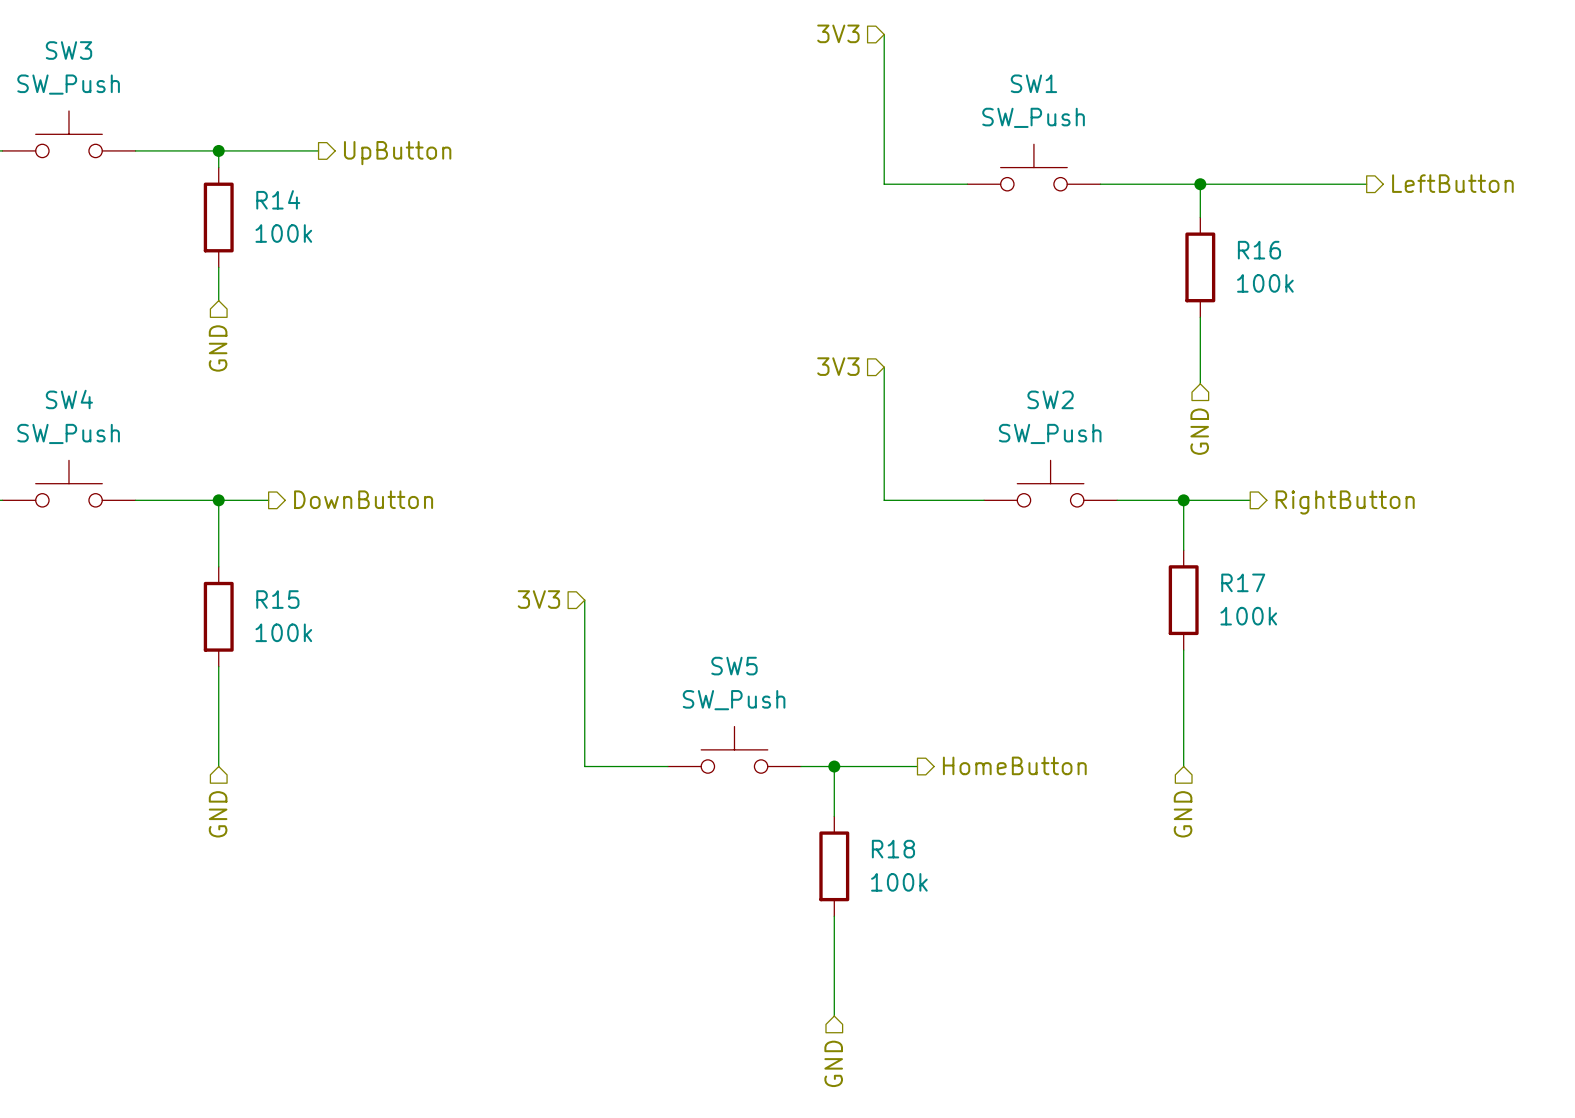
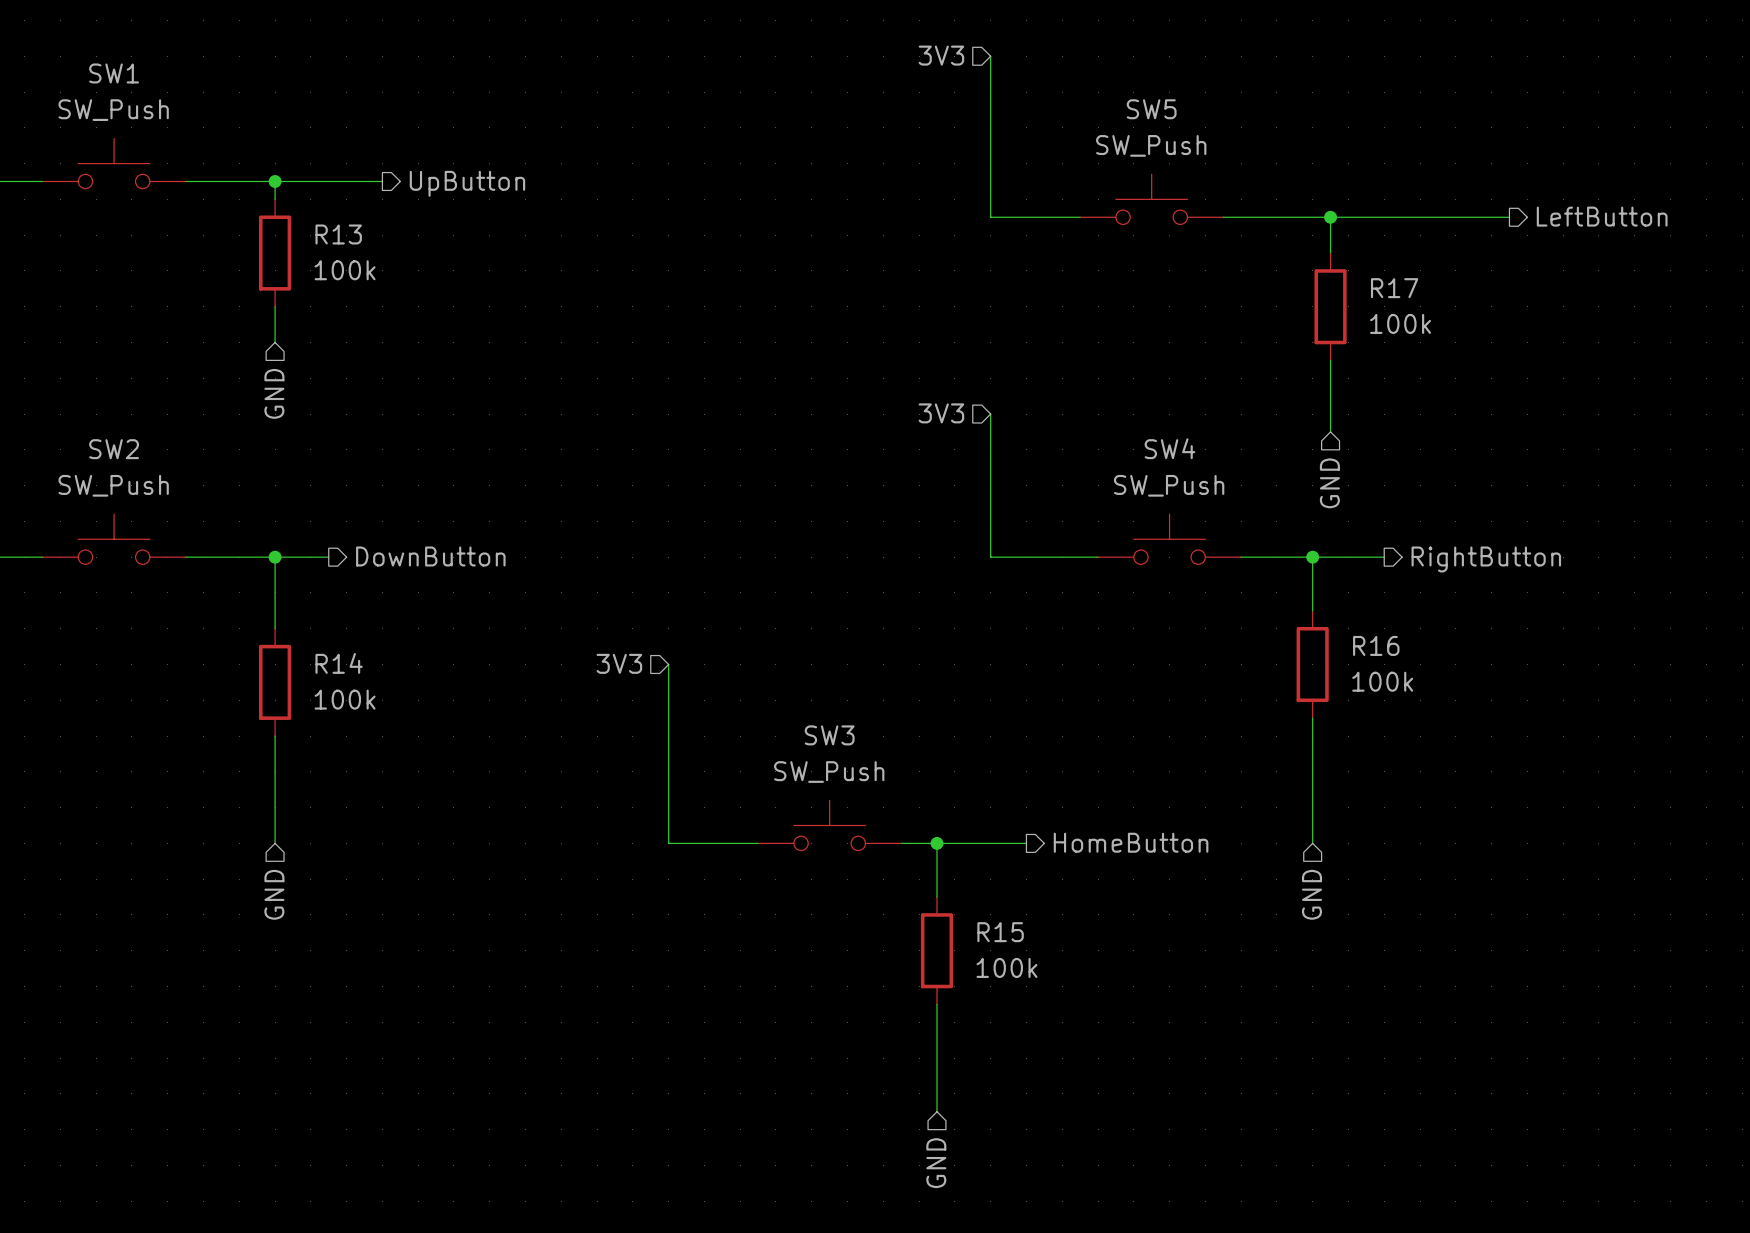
SW3 name: SW3 (68, 50) -> SW1 (114, 73)
SW1 name: SW1 (1033, 83) -> SW5 (1151, 109)
R14 name: R14 (278, 199) -> R13 (338, 234)
R16 name: R16 (1259, 250) -> R17 (1394, 288)
SW4 name: SW4 (69, 399) -> SW2 (114, 449)
SW2 name: SW2 (1050, 399) -> SW4 (1169, 448)
R17 name: R17 (1243, 582) -> R16 (1376, 645)
R15 name: R15 (277, 599) -> R14 (339, 663)
SW5 name: SW5 (734, 666) -> SW3 (829, 735)
R18 name: R18 (893, 849) -> R15 (1000, 932)

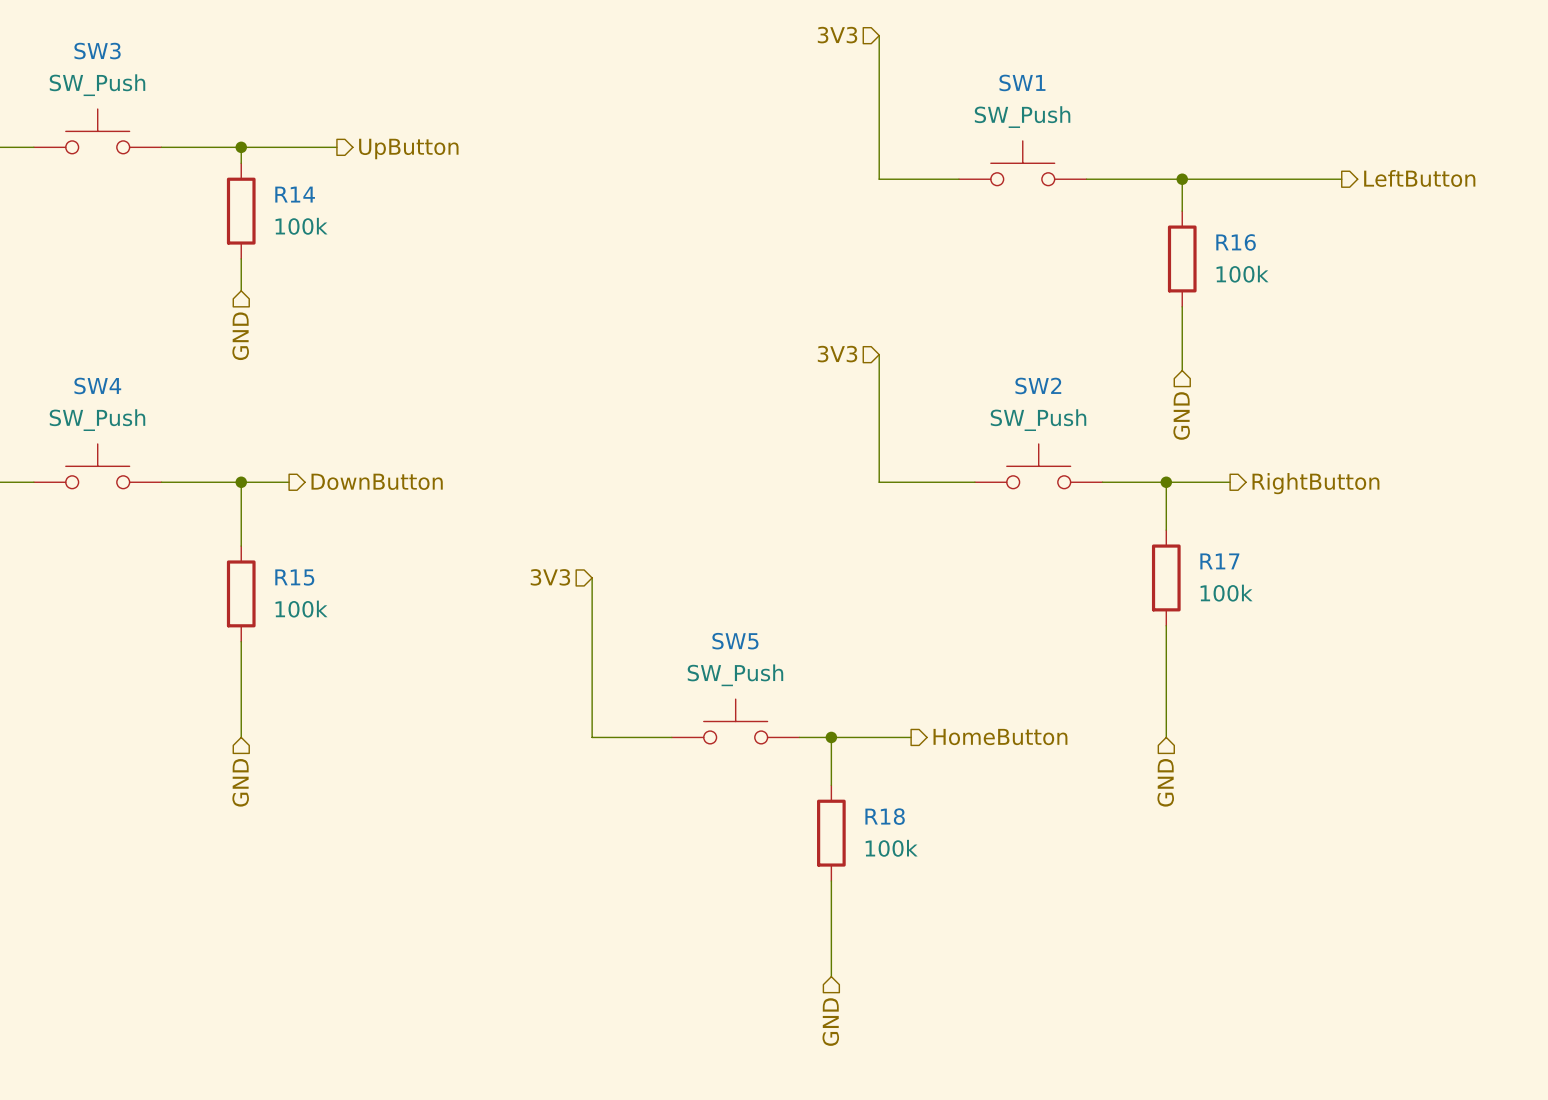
SW1 name: SW1 (114, 73) -> SW3 (97, 51)
SW5 name: SW5 (1151, 109) -> SW1 (1022, 82)
R13 name: R13 (338, 234) -> R14 (295, 194)
R17 name: R17 (1394, 288) -> R16 (1236, 242)
SW4 name: SW4 (1169, 448) -> SW2 (1038, 385)
SW2 name: SW2 (114, 449) -> SW4 (97, 385)
R16 name: R16 (1376, 645) -> R17 (1219, 561)
R14 name: R14 (339, 663) -> R15 (294, 577)
SW3 name: SW3 (829, 735) -> SW5 (735, 641)
R15 name: R15 (1000, 932) -> R18 (885, 816)

